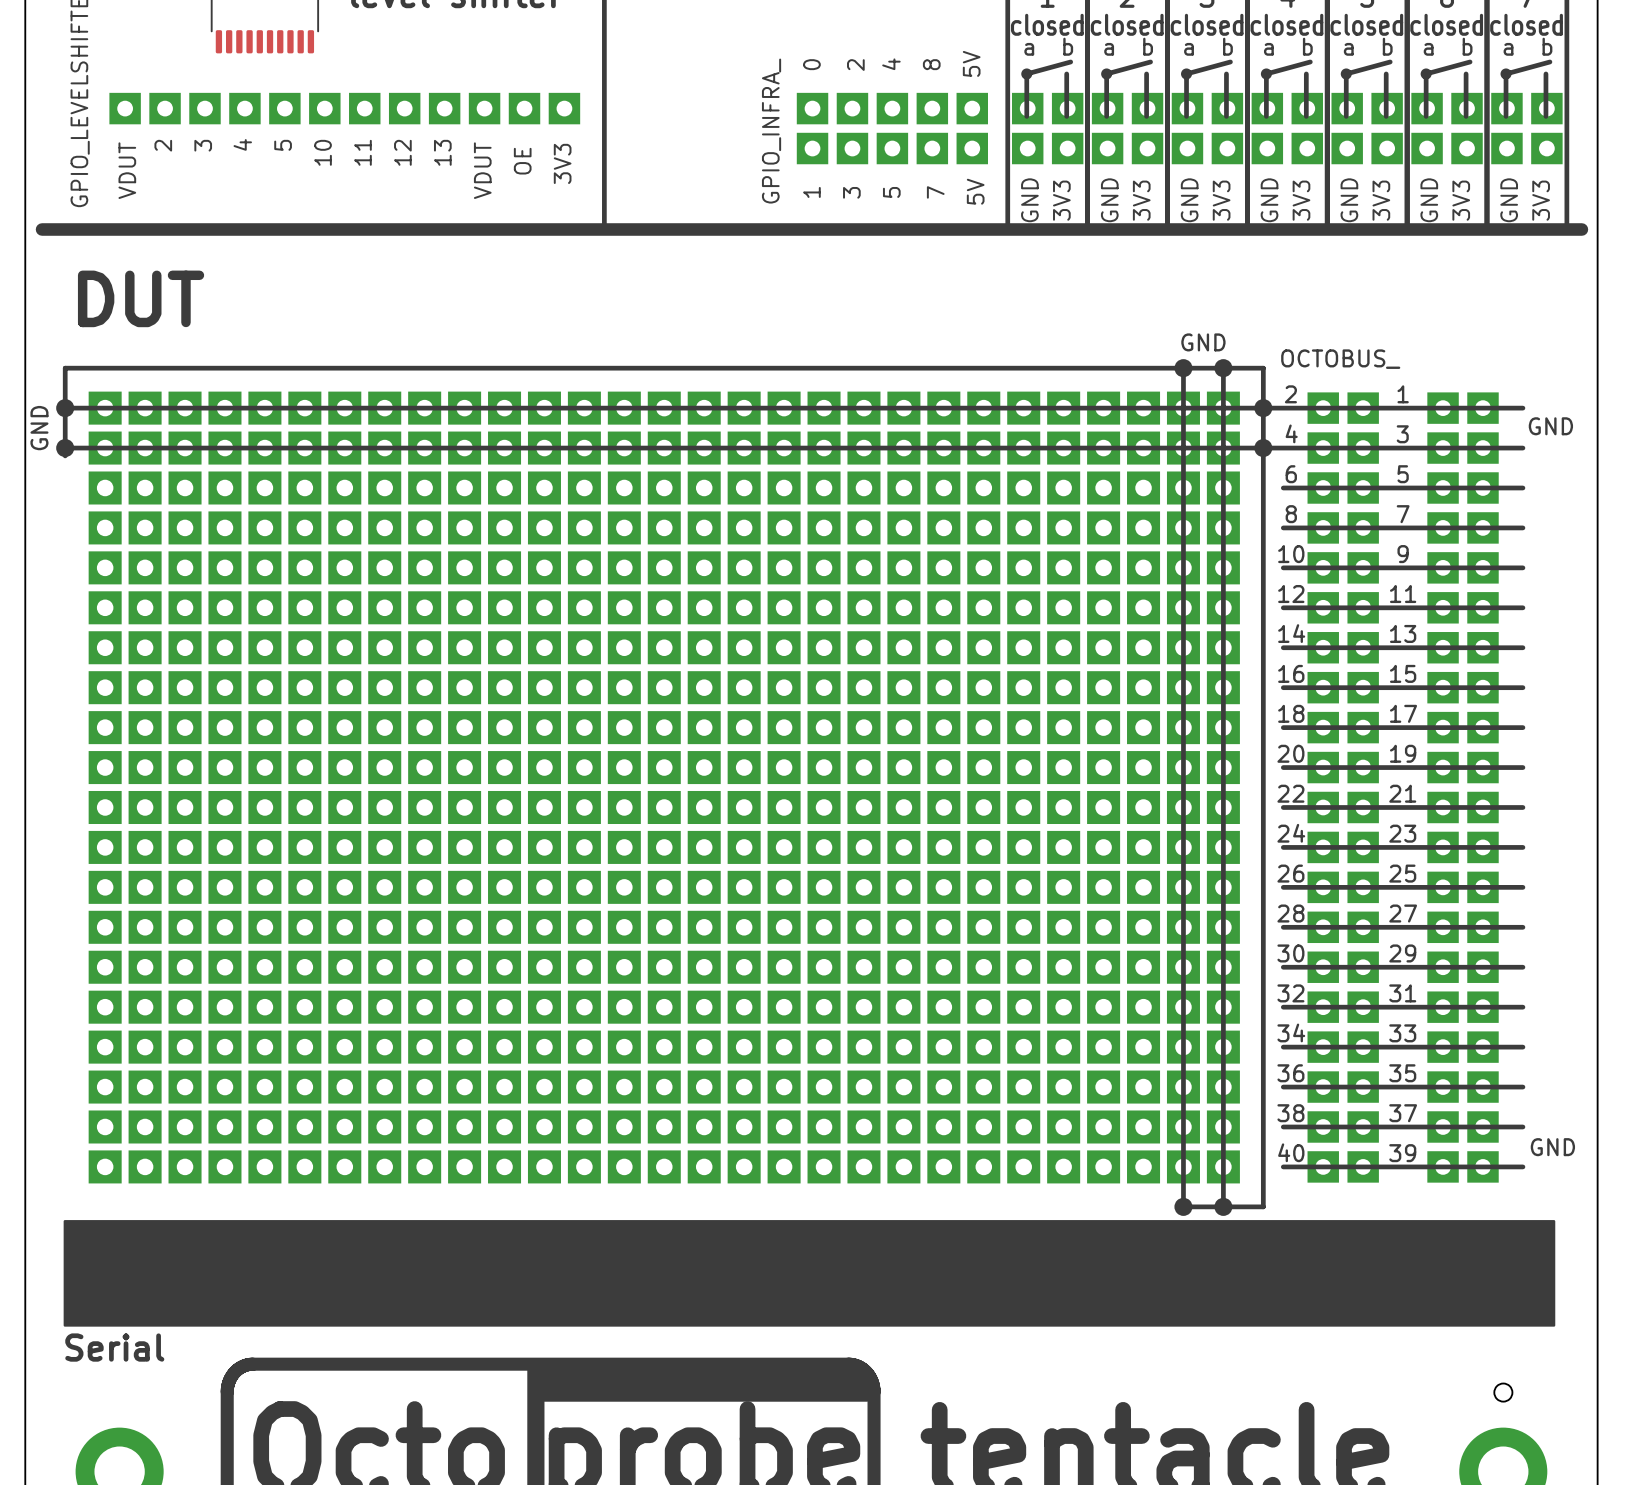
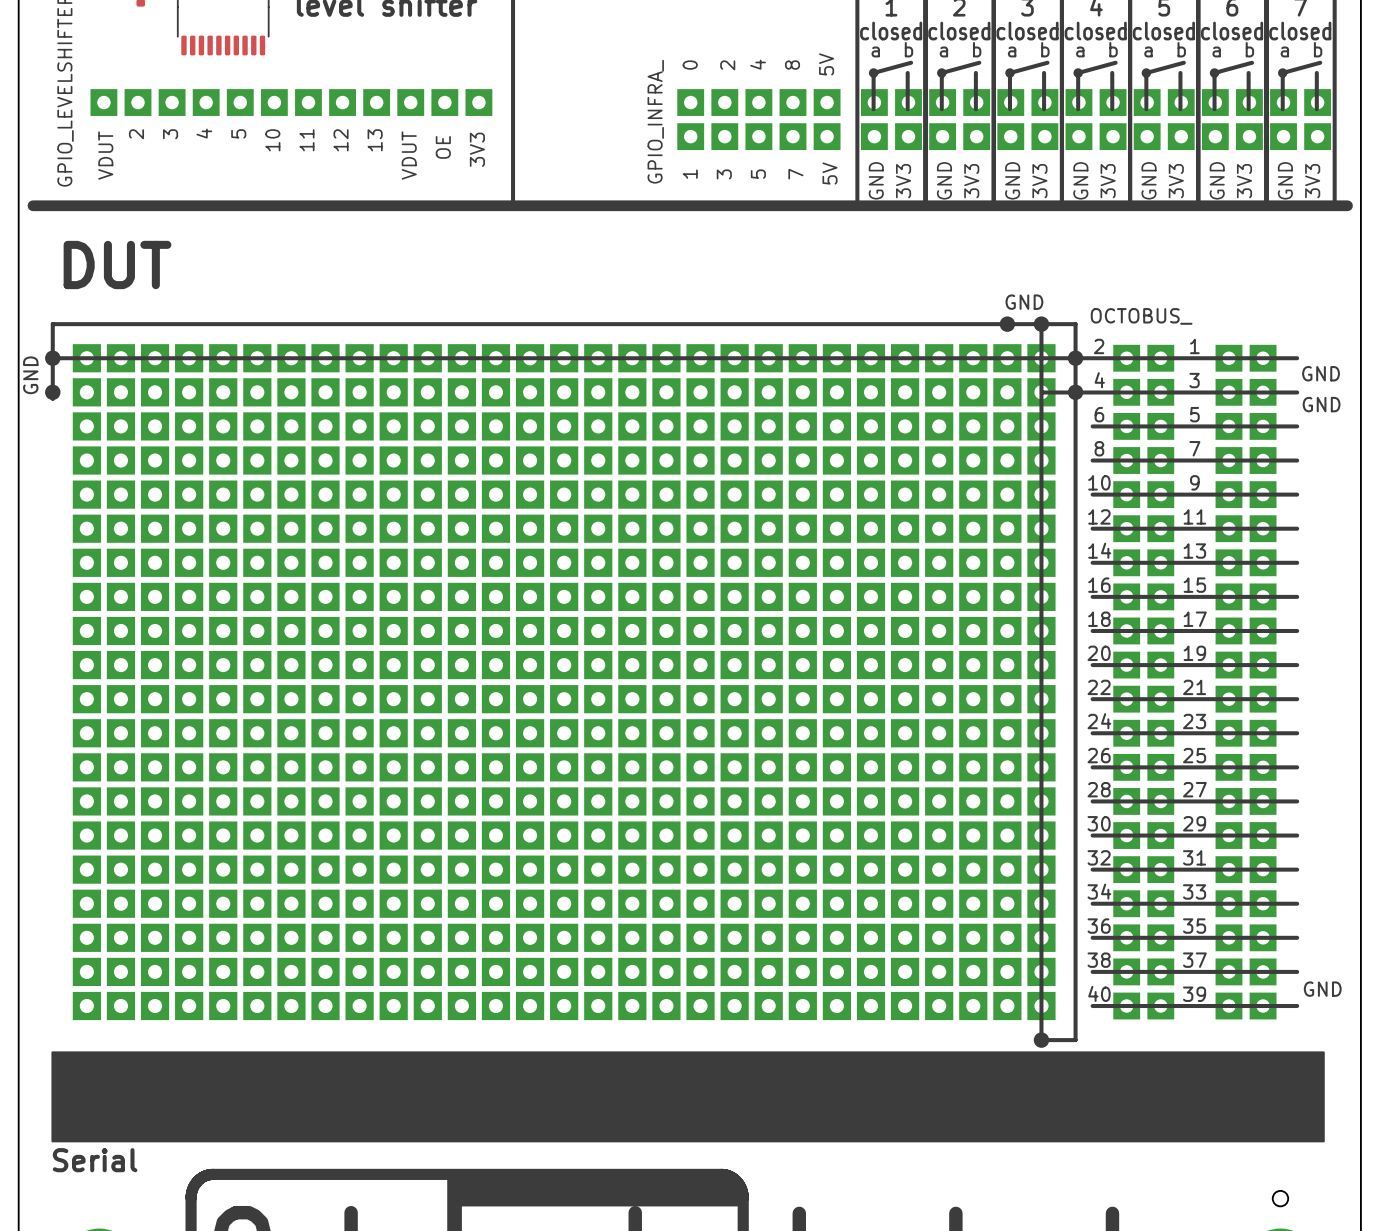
line: (1183, 368) (1183, 1206) (1223, 1206) -> none
line: (65, 448) (1522, 448) -> (1042, 392) (1297, 392)
text: none -> GND (1321, 404)
drawing: [1174, 1197, 1193, 1216] -> none

